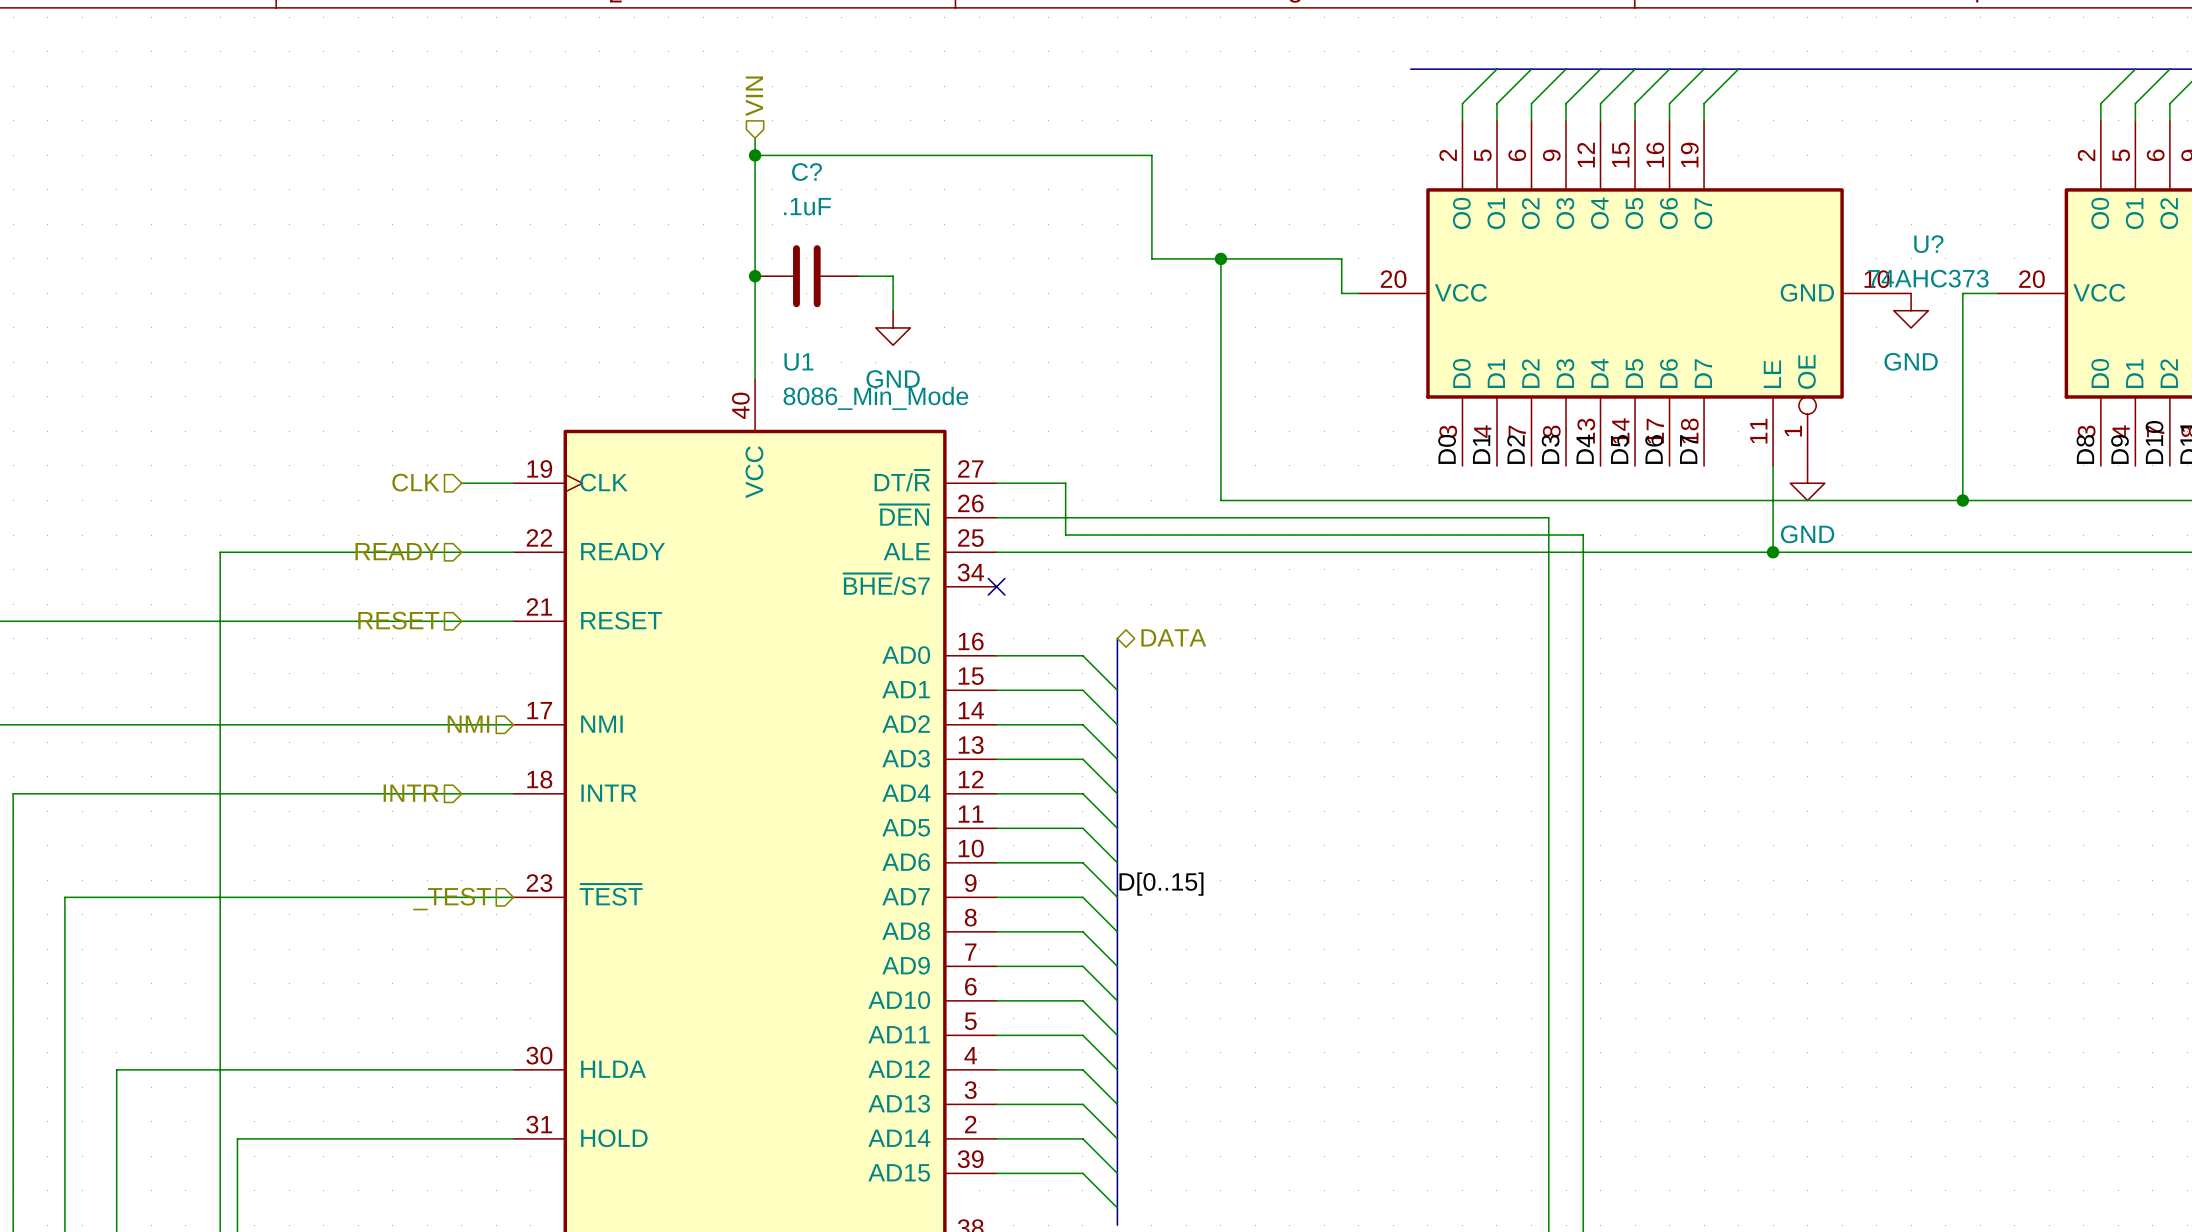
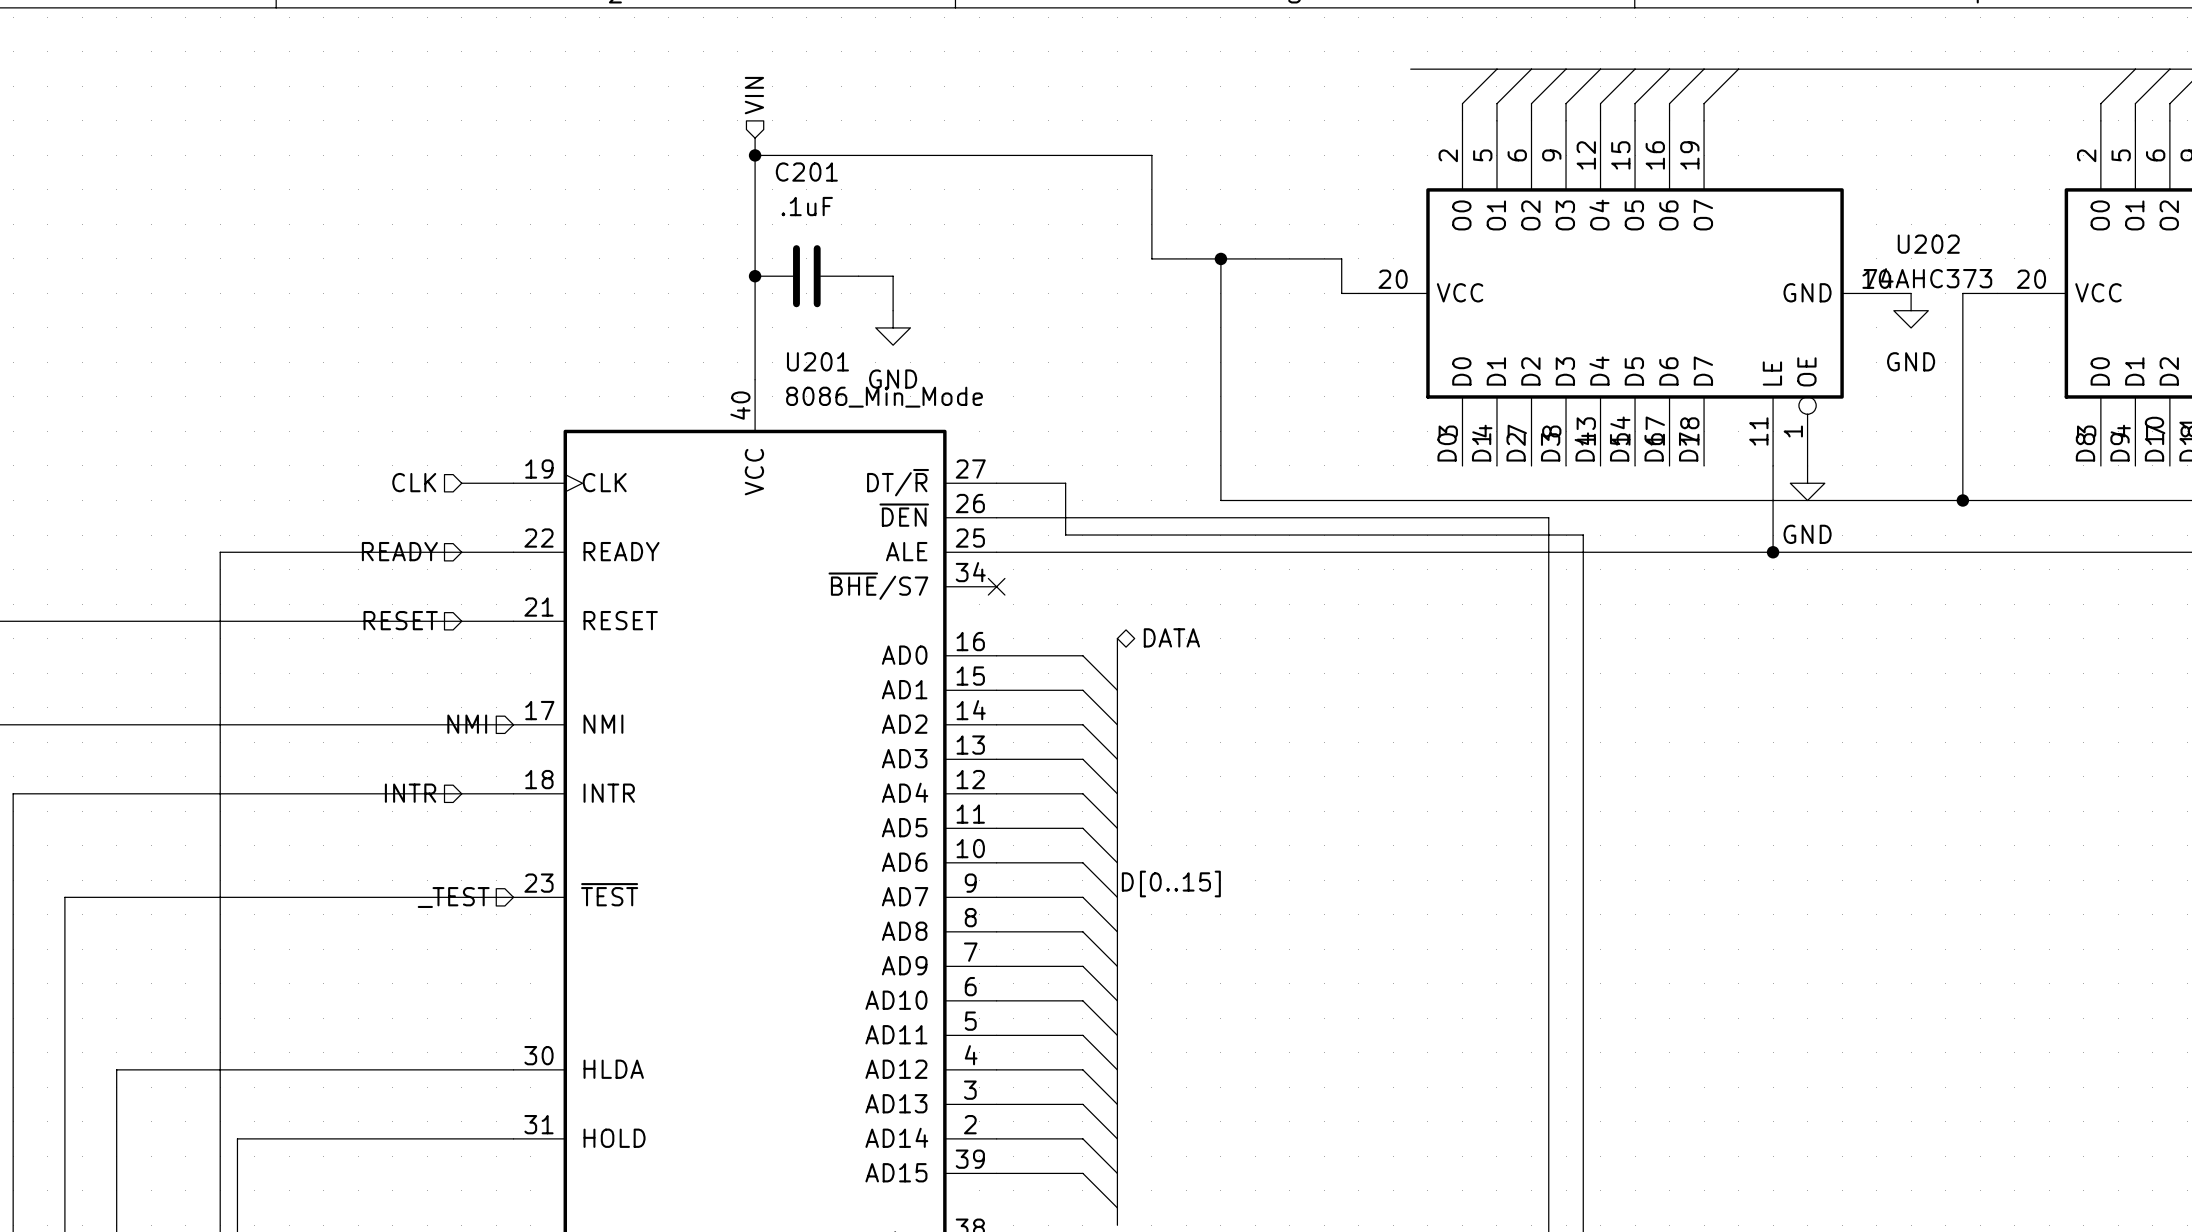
C? name: C? (807, 172) -> C201 (806, 172)
U? name: U? (1928, 244) -> U202 (1928, 244)
U1 name: U1 (798, 361) -> U201 (817, 361)

